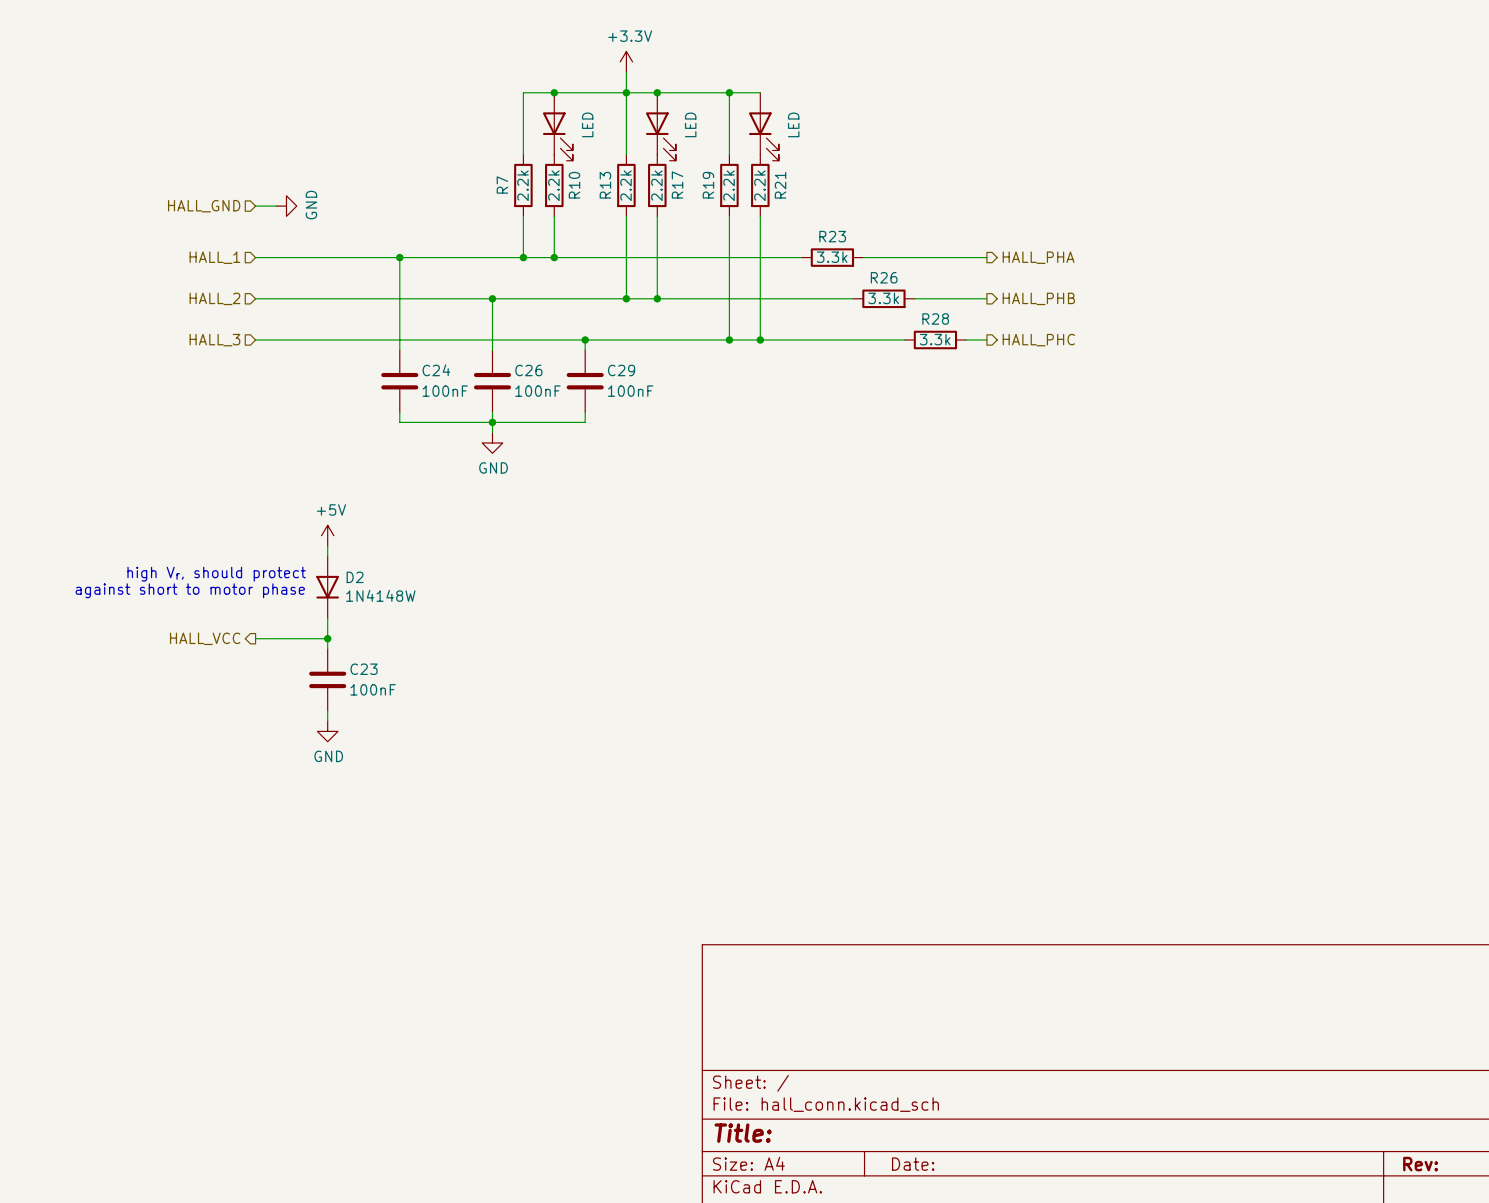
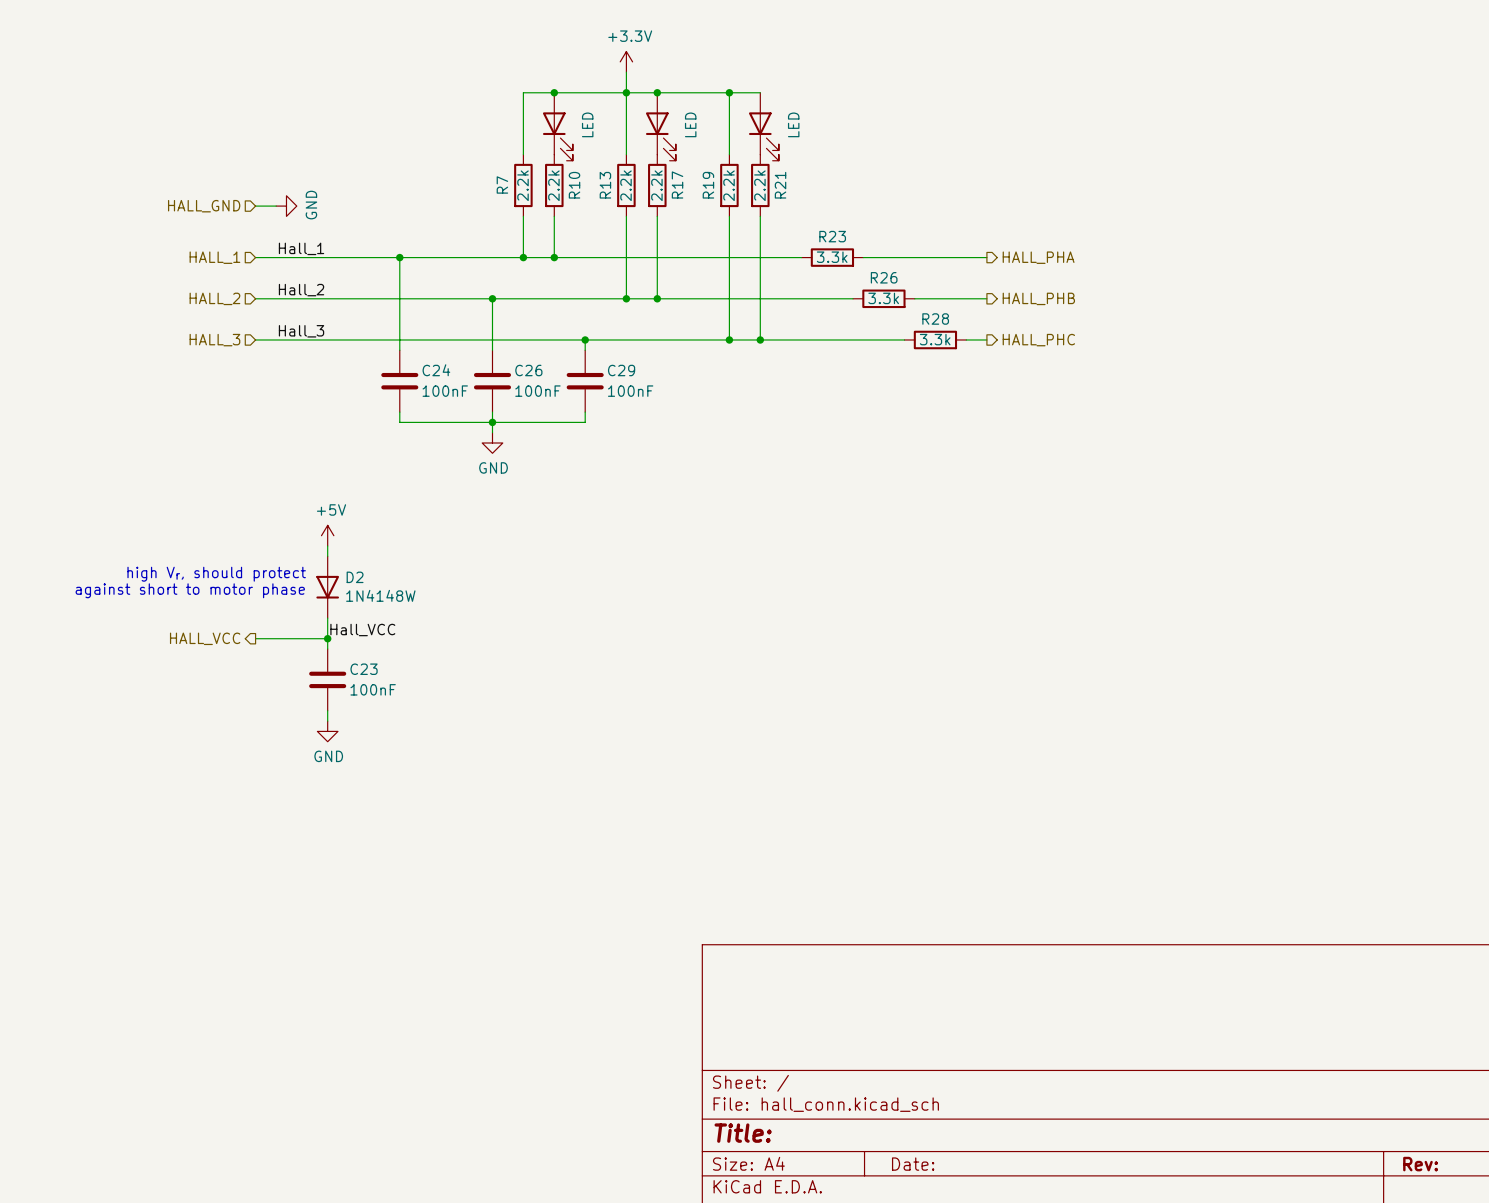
label: none -> Hall_1 (301, 248)
label: none -> Hall_2 (301, 290)
label: none -> Hall_3 (301, 331)
label: none -> Hall_VCC (362, 630)

